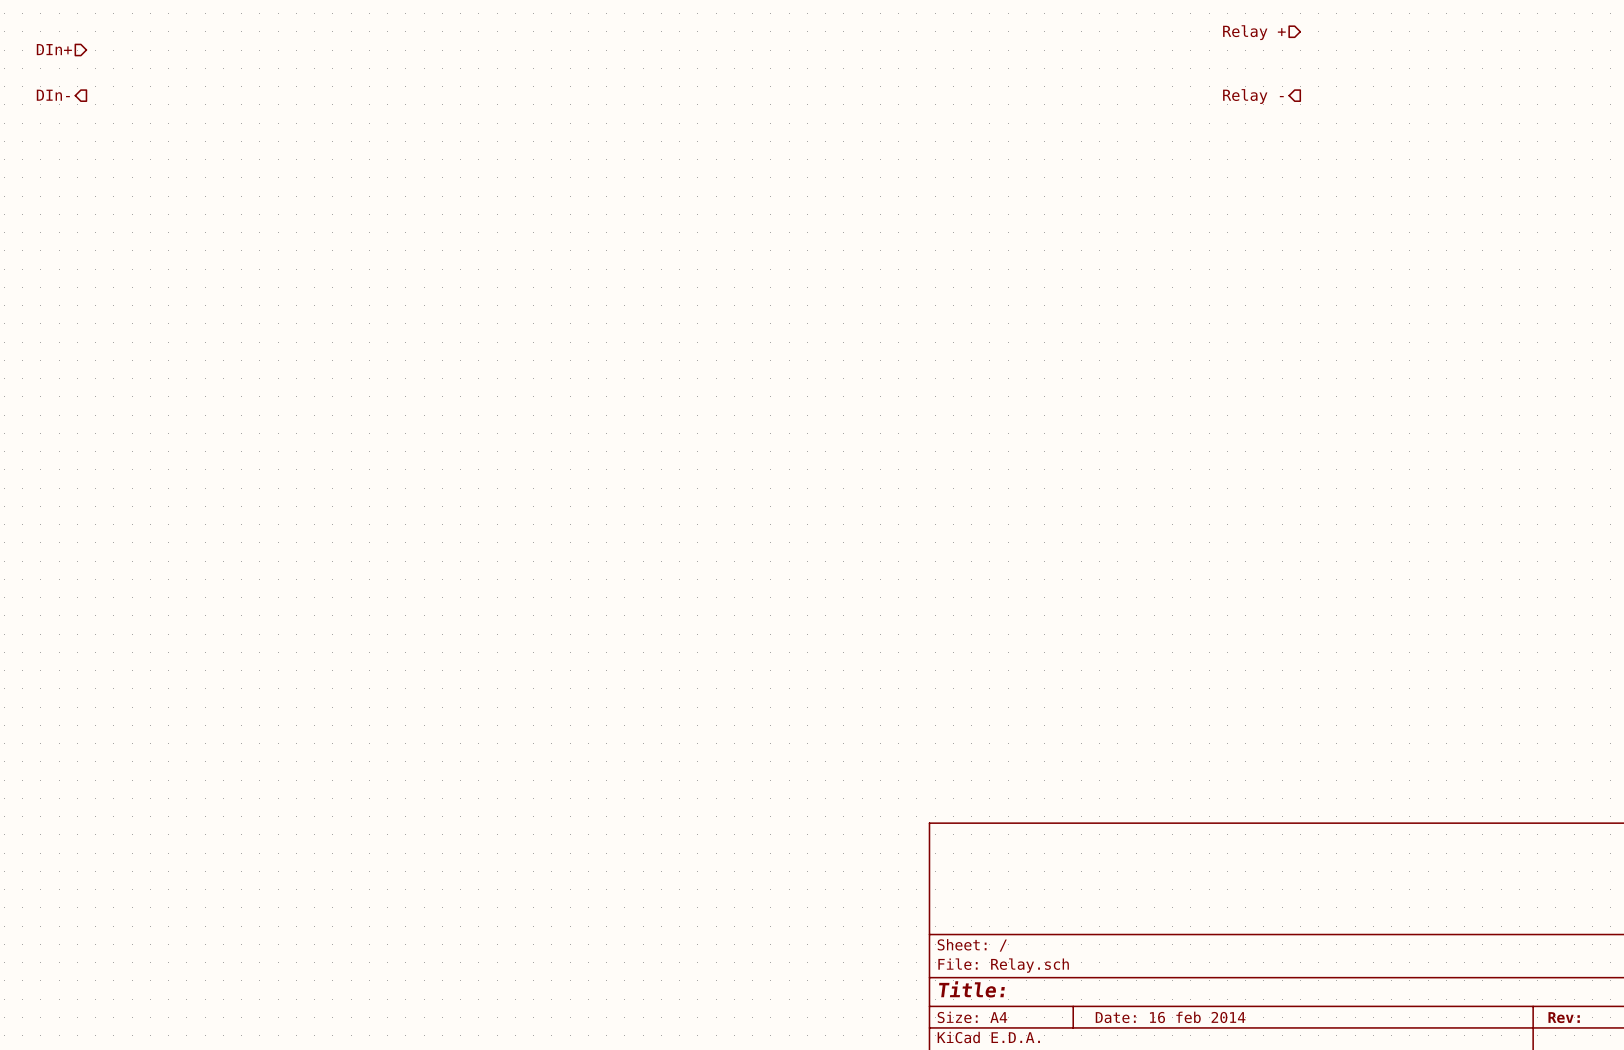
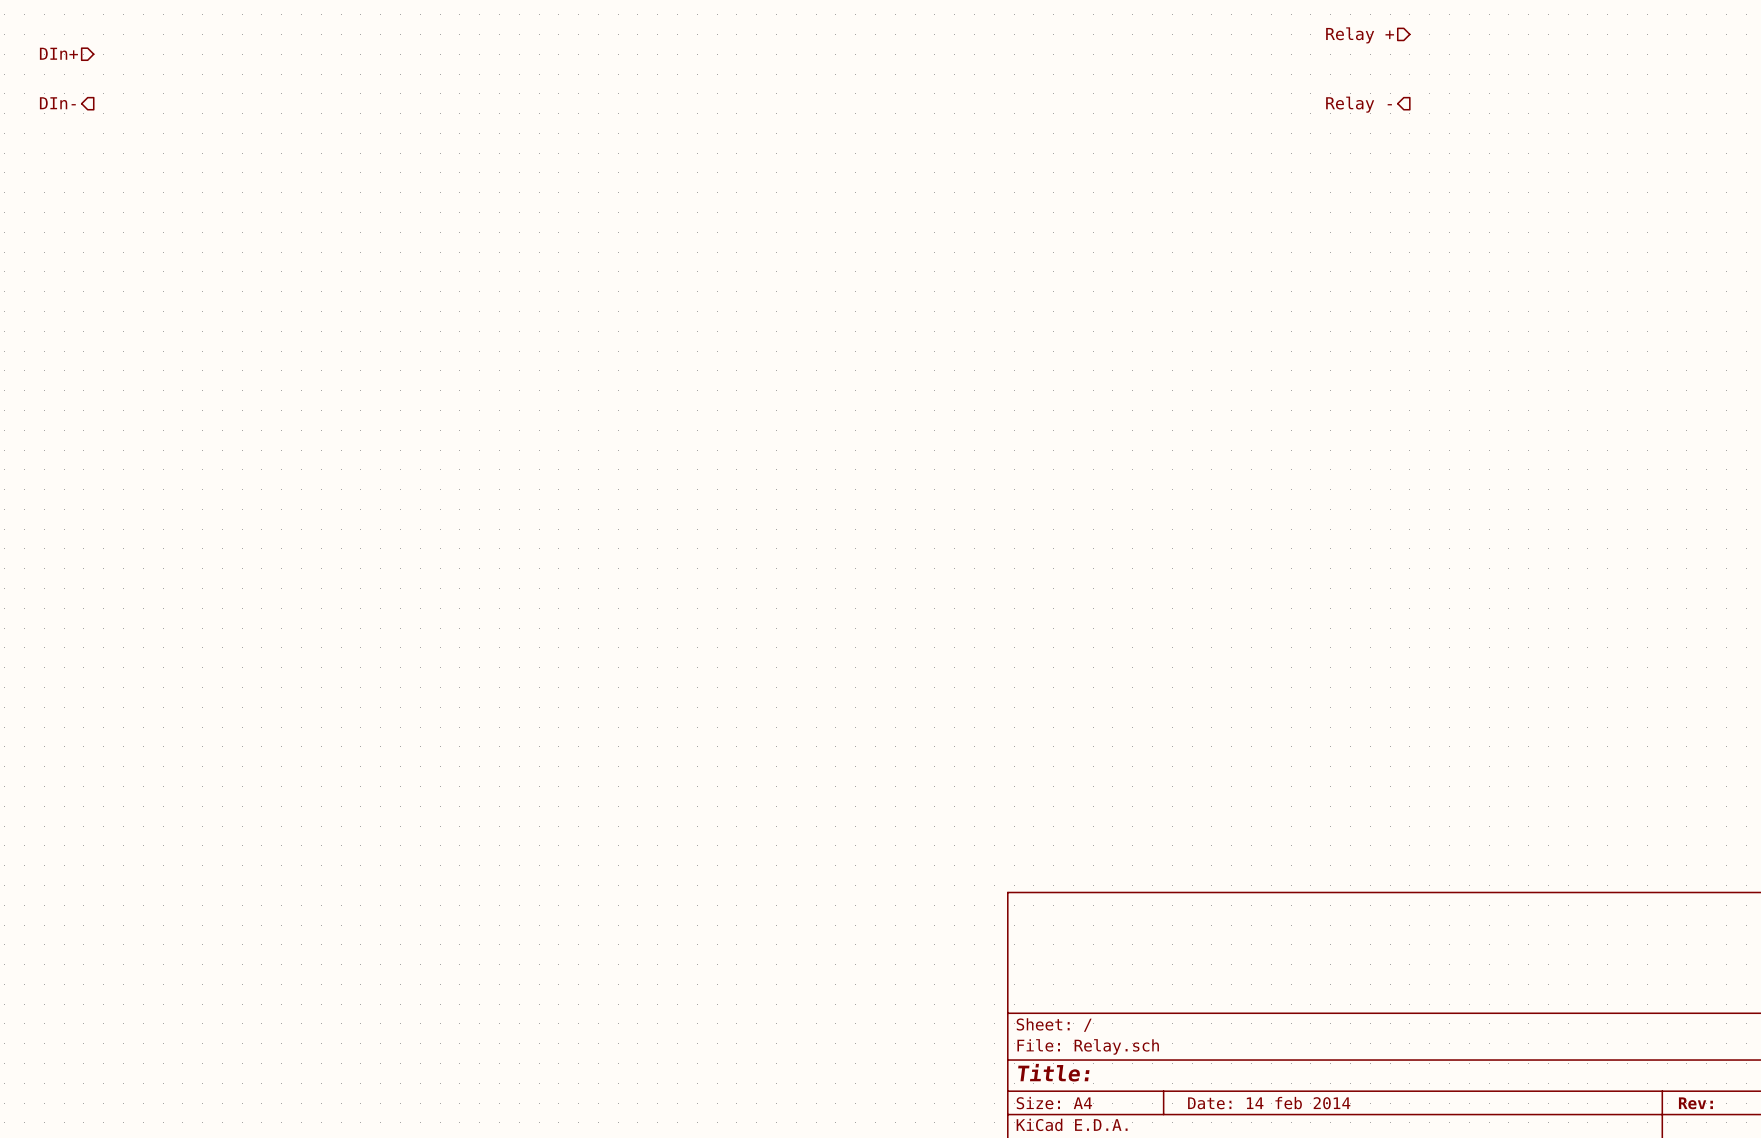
title block: Date: 16 feb 2014 (1170, 1017) -> Date: 14 feb 2014 (1269, 1103)

